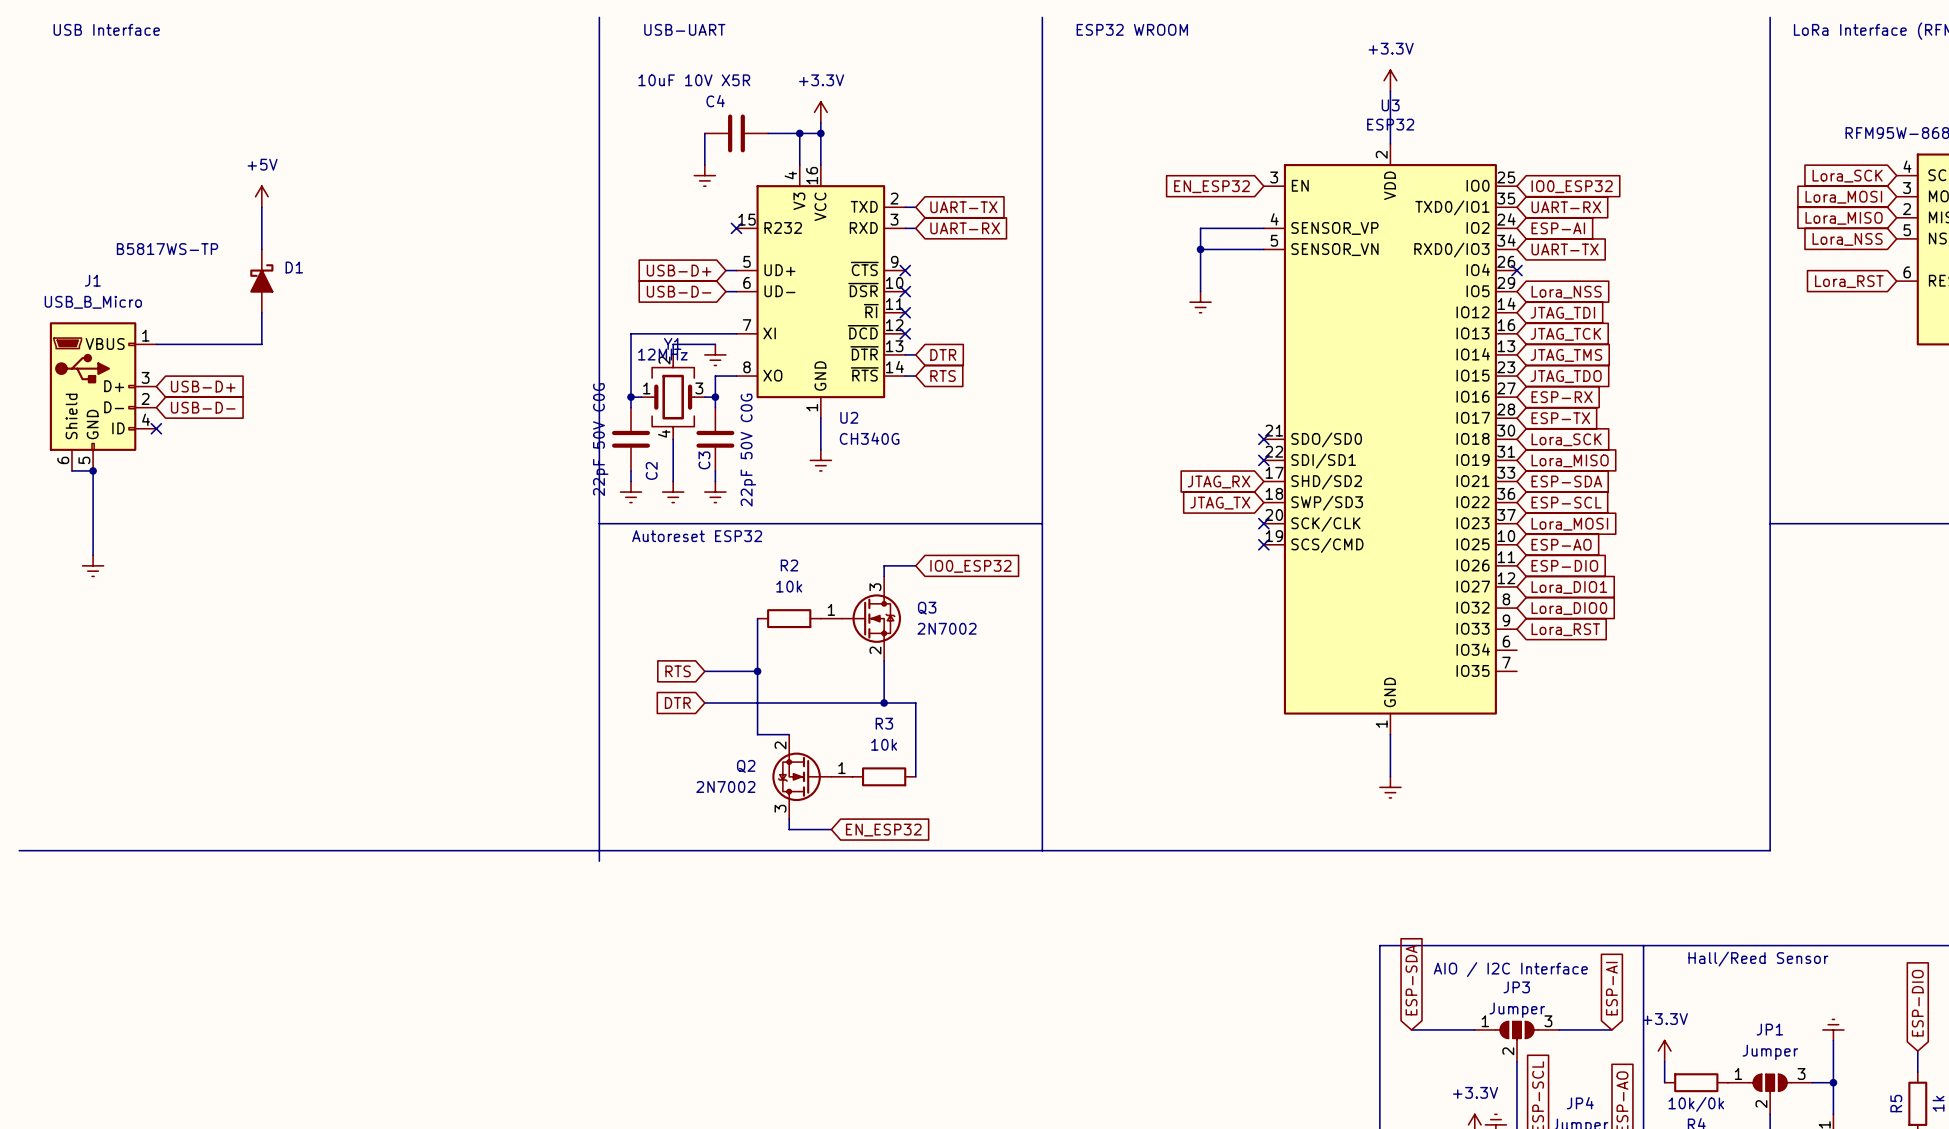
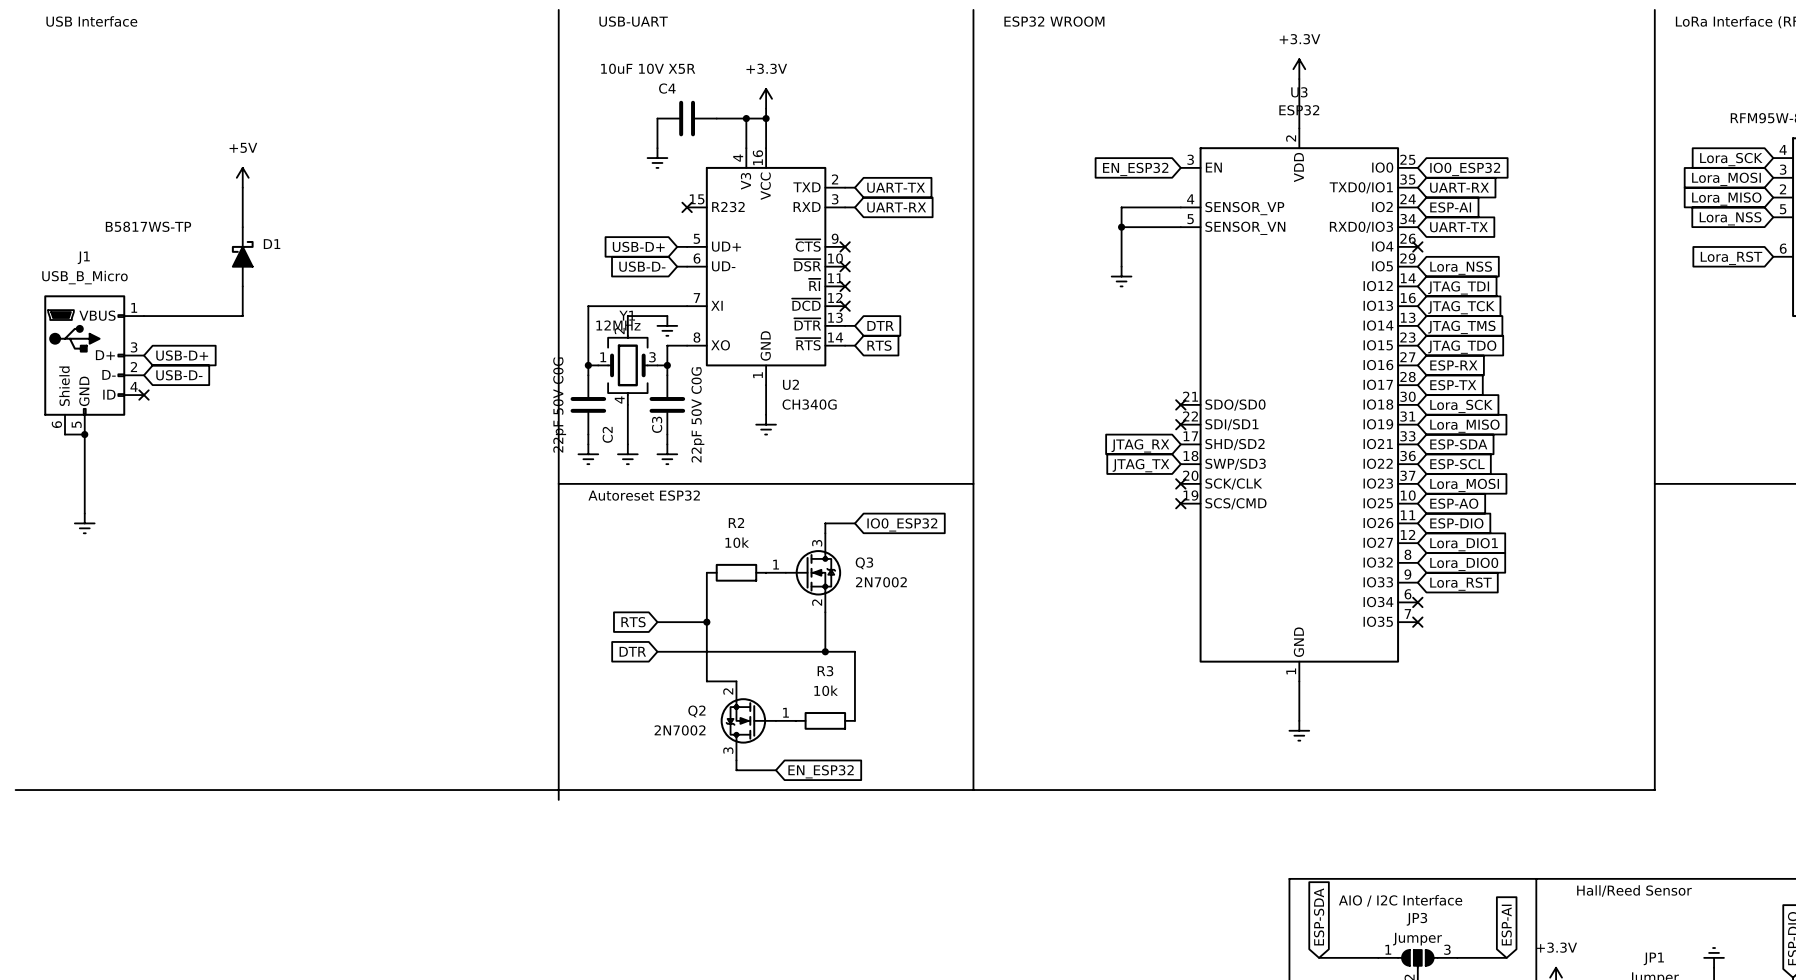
no-connect mark: none -> (1417, 602)
no-connect mark: none -> (1417, 622)

